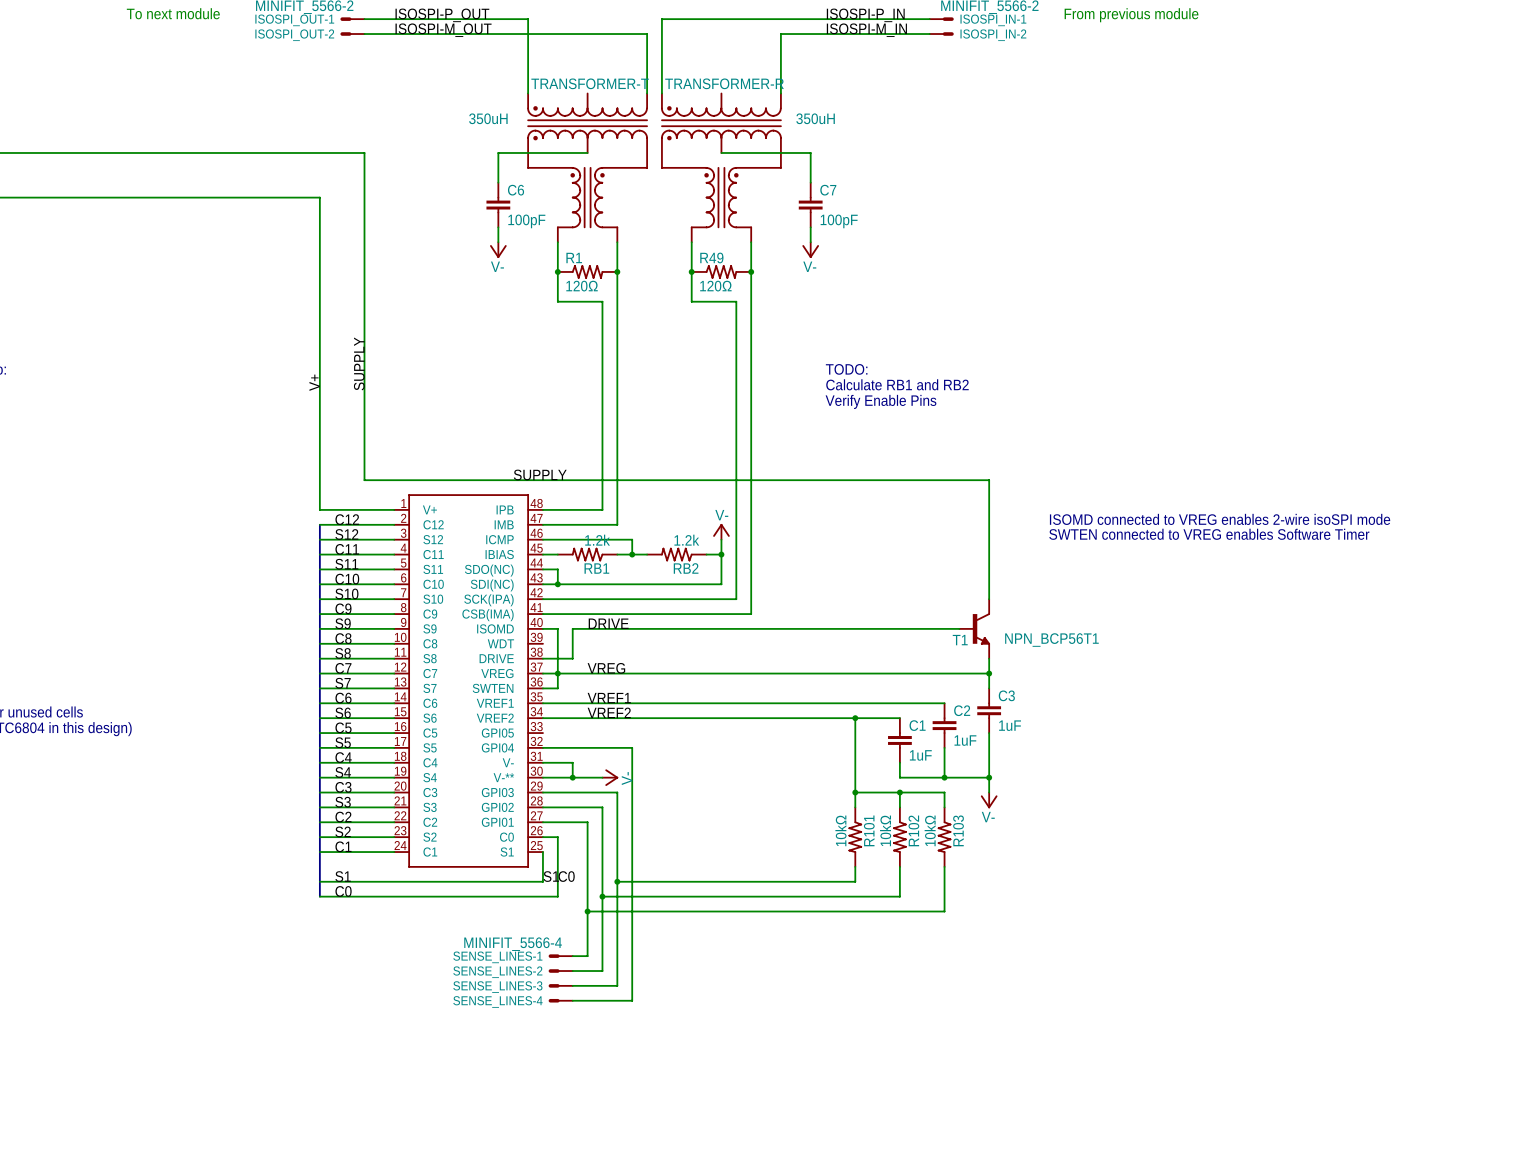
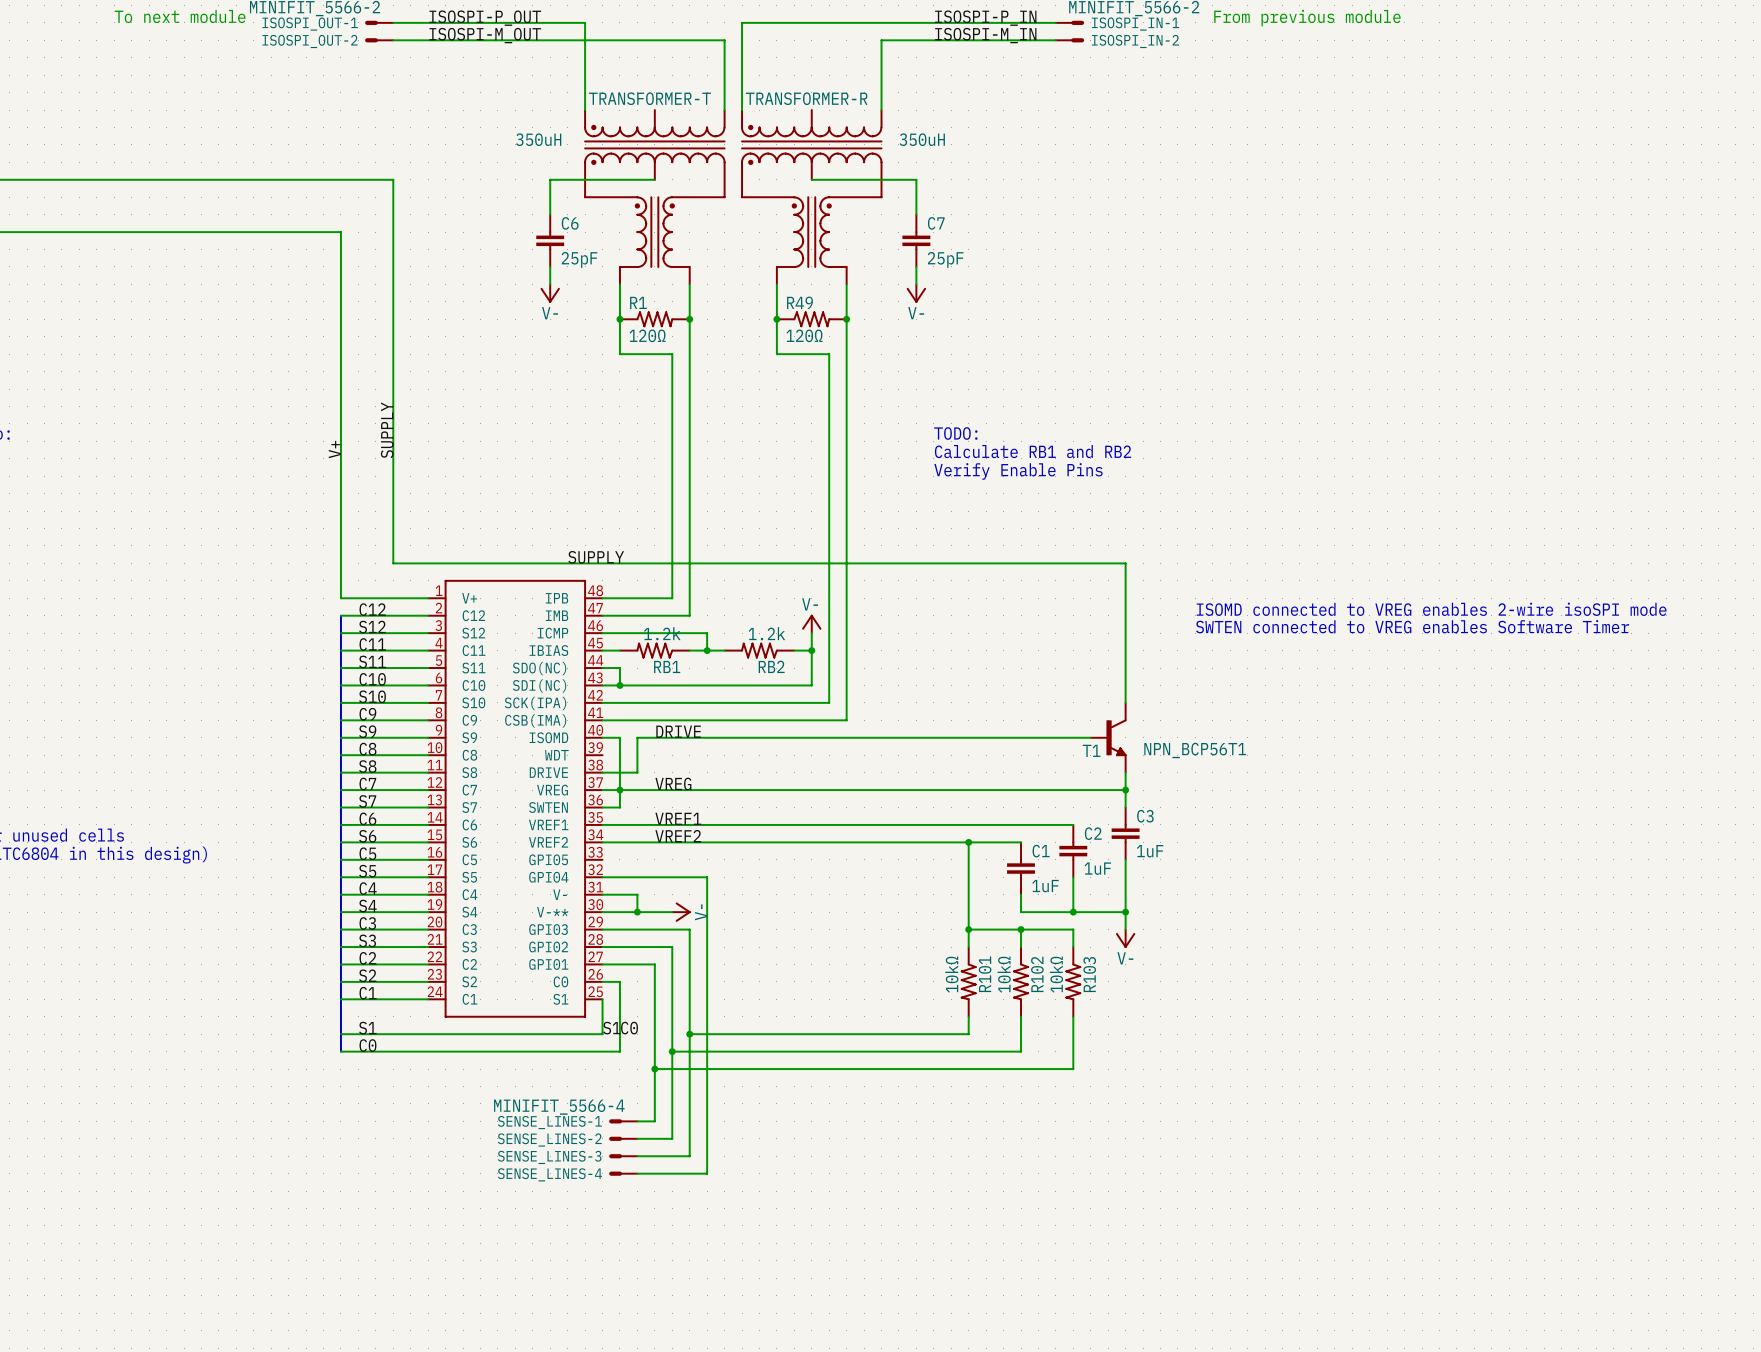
C6 value: 100pF (526, 221) -> 25pF (579, 259)
C7 value: 100pF (839, 221) -> 25pF (945, 259)

